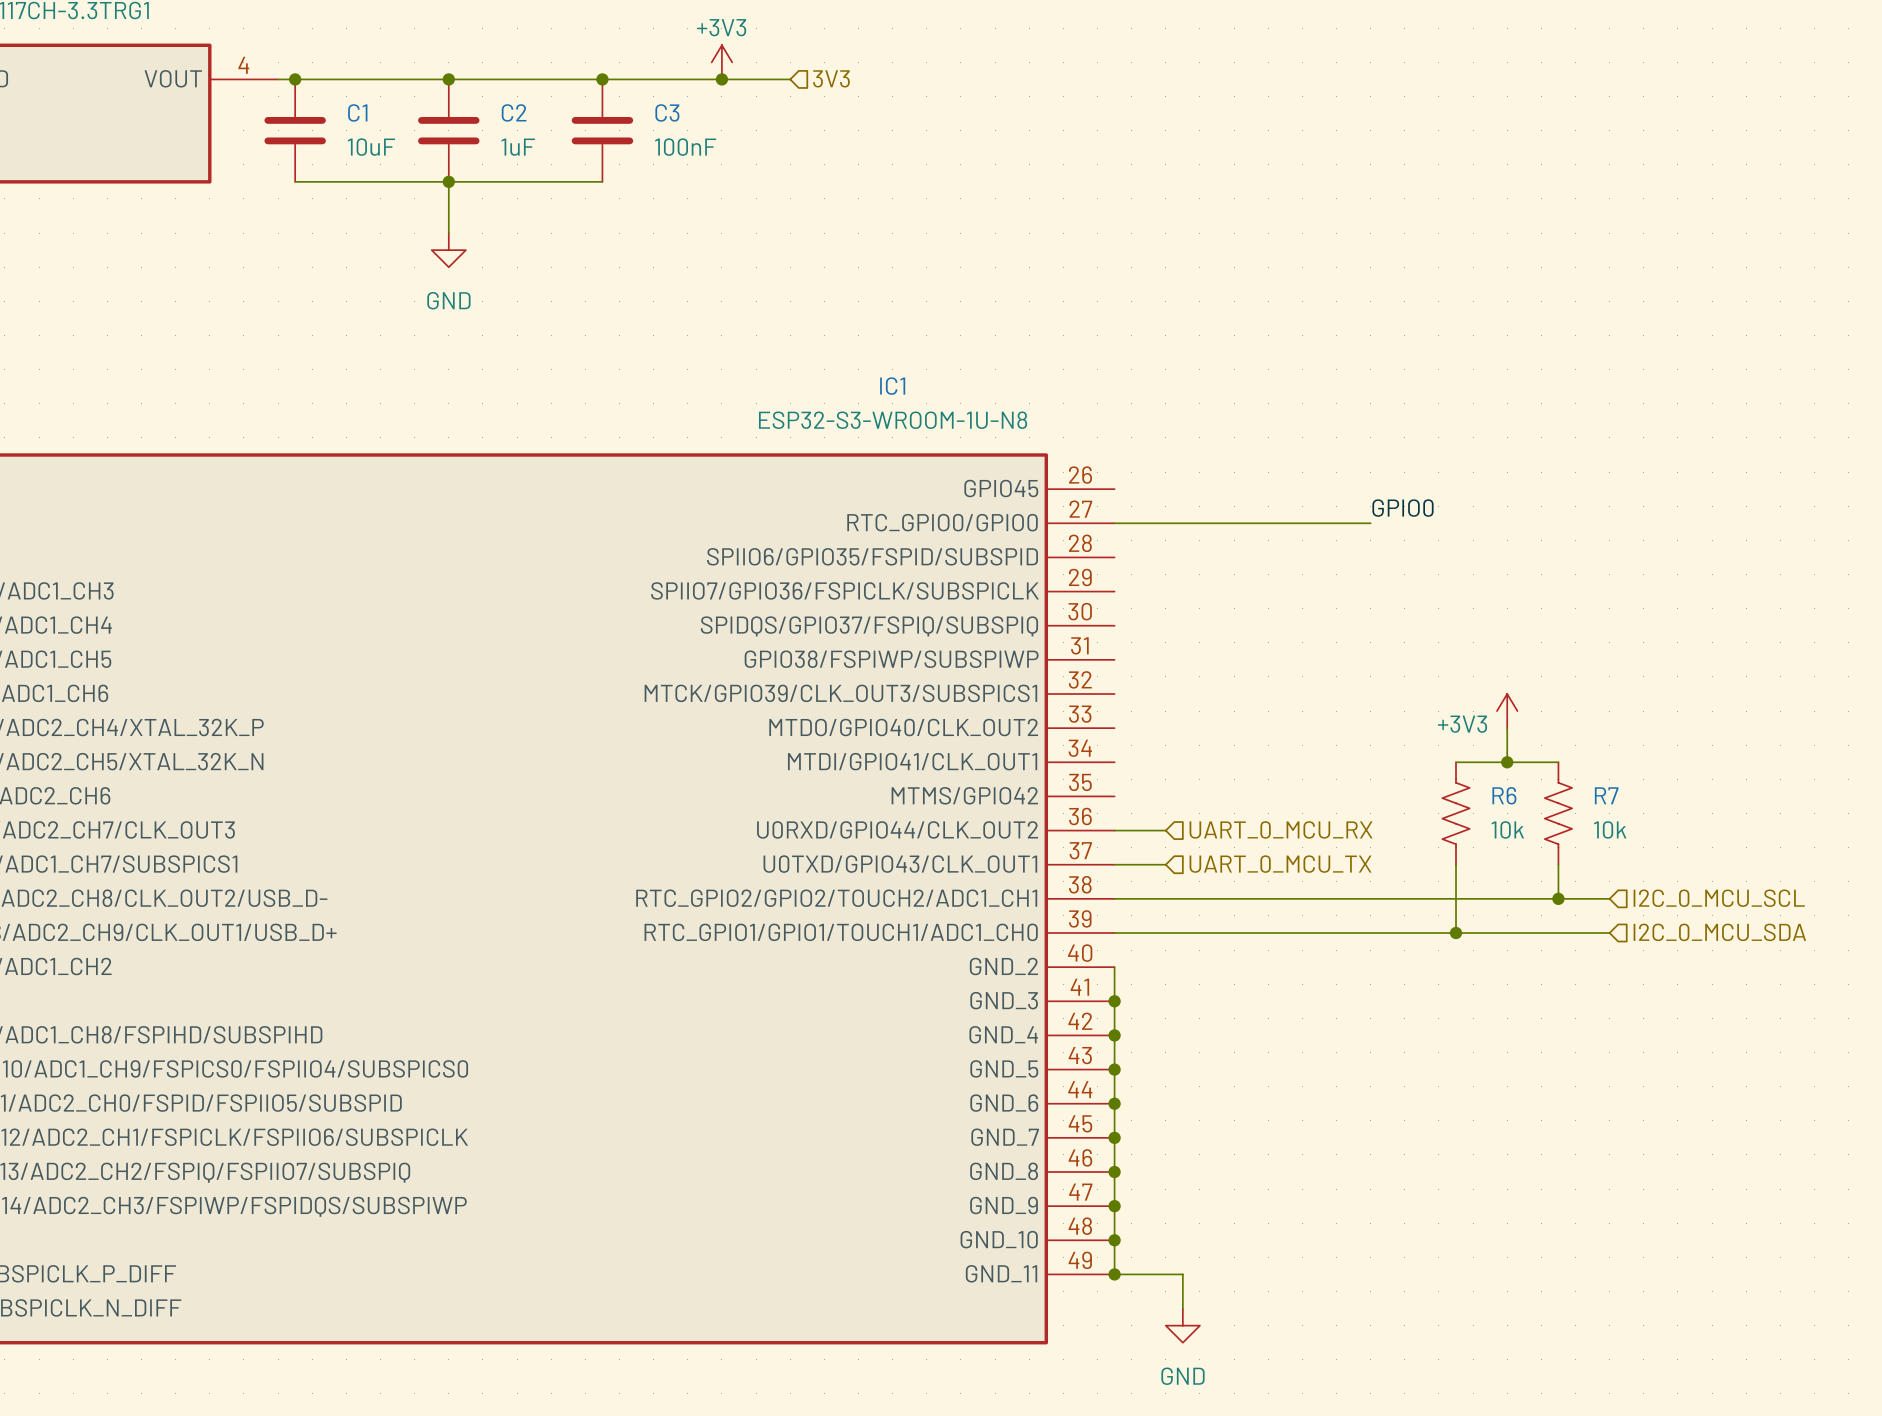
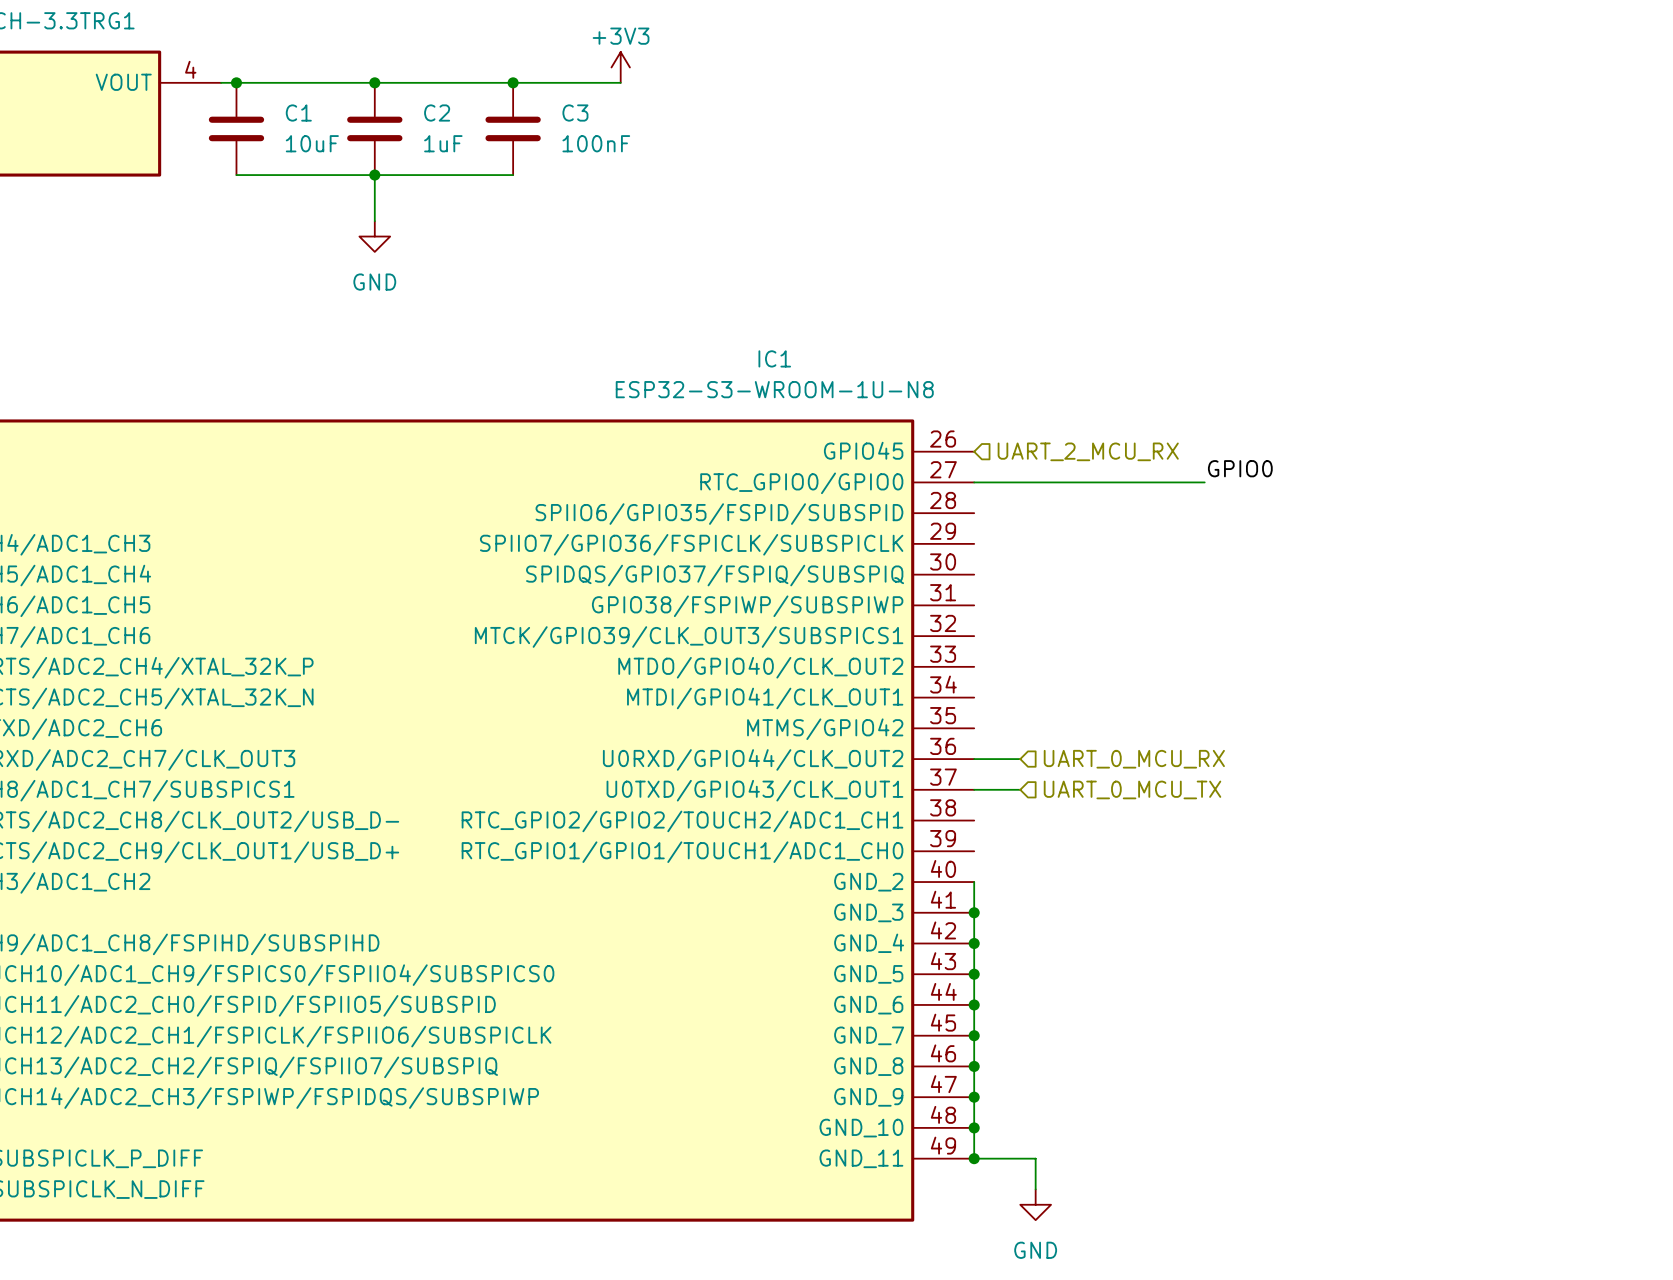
hierarchical label: 3V3 (831, 78) -> none
wire: (721, 79) (790, 79) -> none
junction: (721, 79) -> none
hierarchical label: none -> UART_2_MCU_RX (1088, 451)
power symbol: +3V3 (1507, 711) -> none
wire: (1507, 728) (1507, 762) -> none
wire: (1456, 762) (1558, 762) -> none
junction: (1507, 762) -> none
R6: 10k (1456, 813) -> none
R7: 10k (1558, 813) -> none
wire: (1456, 864) (1456, 933) -> none
wire: (1558, 864) (1558, 898) -> none
wire: (1114, 898) (1609, 898) -> none
junction: (1558, 898) -> none
hierarchical label: I2C_0_MCU_SCL (1719, 898) -> none
hierarchical label: I2C_0_MCU_SDA (1719, 932) -> none
wire: (1114, 933) (1609, 933) -> none
junction: (1456, 933) -> none

